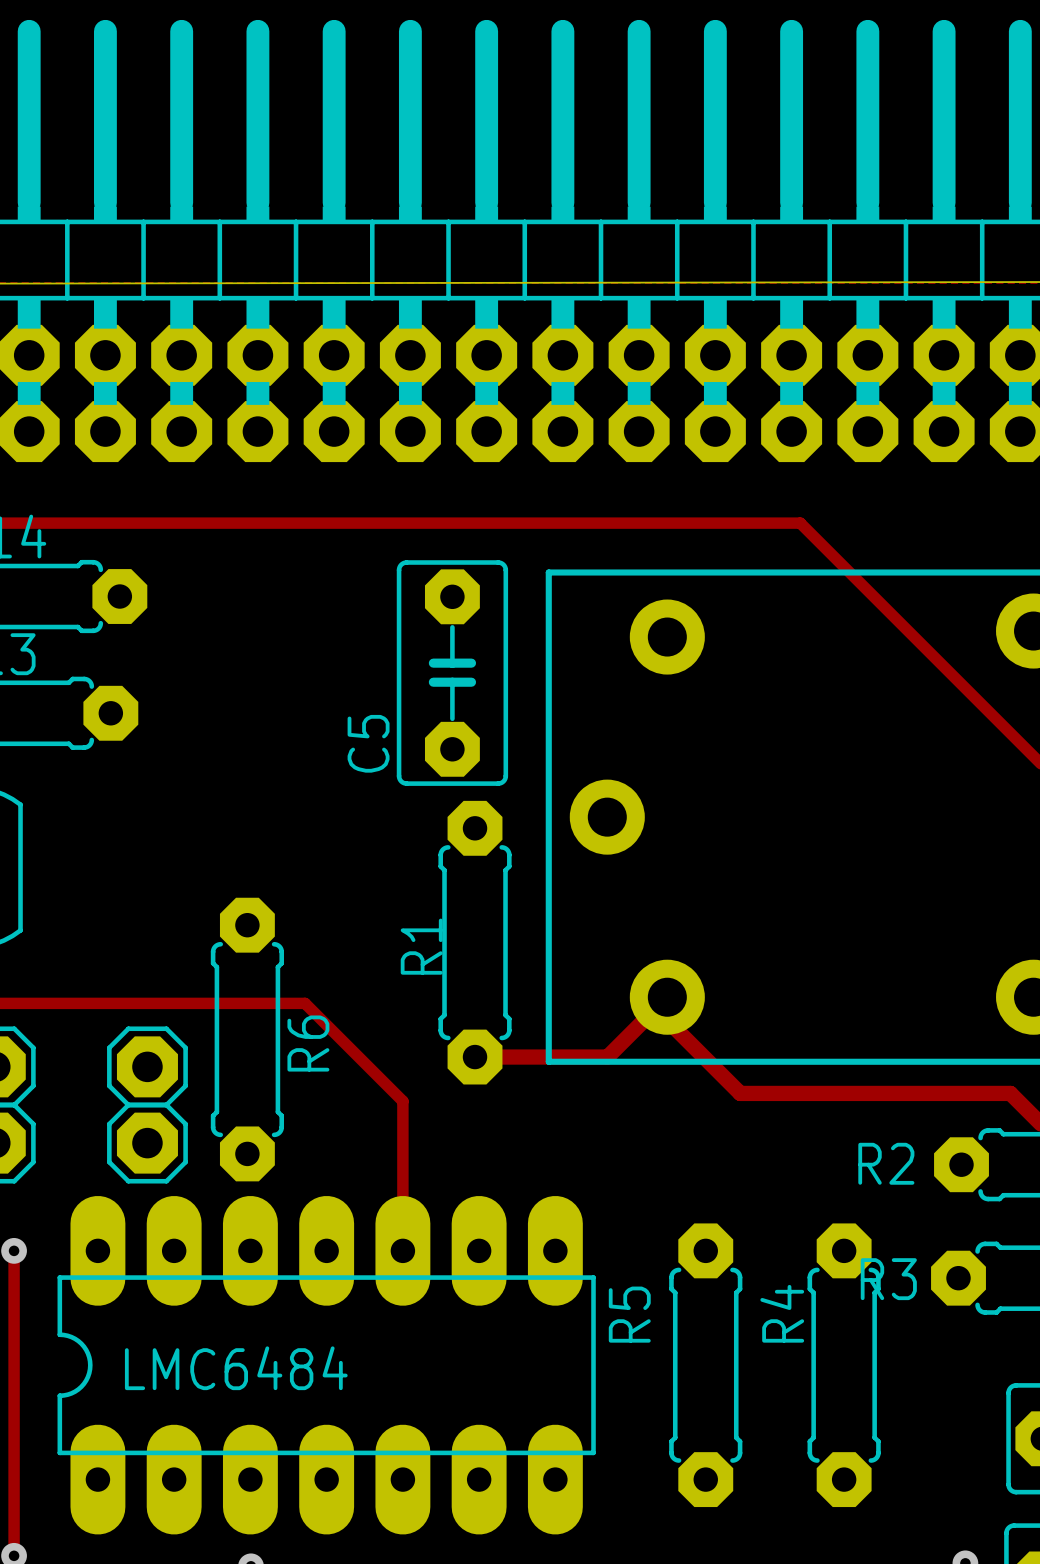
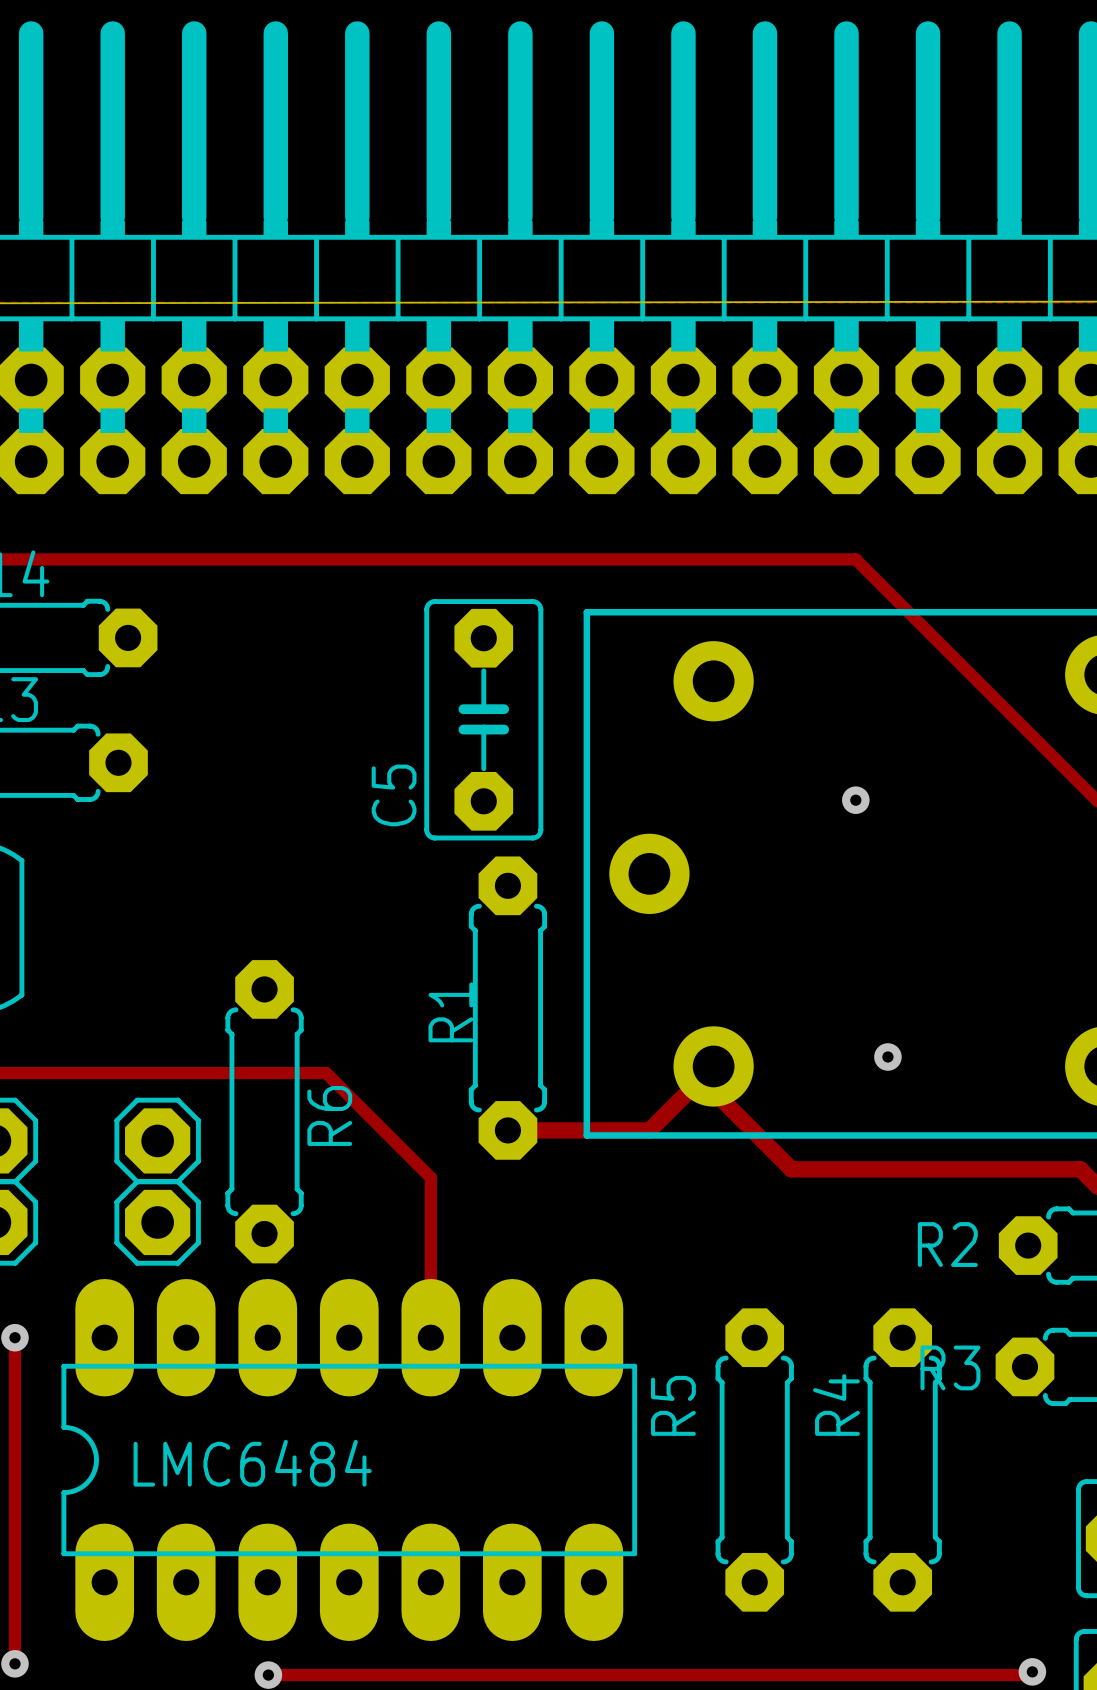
via: none -> (855, 800)
via: none -> (887, 1056)

